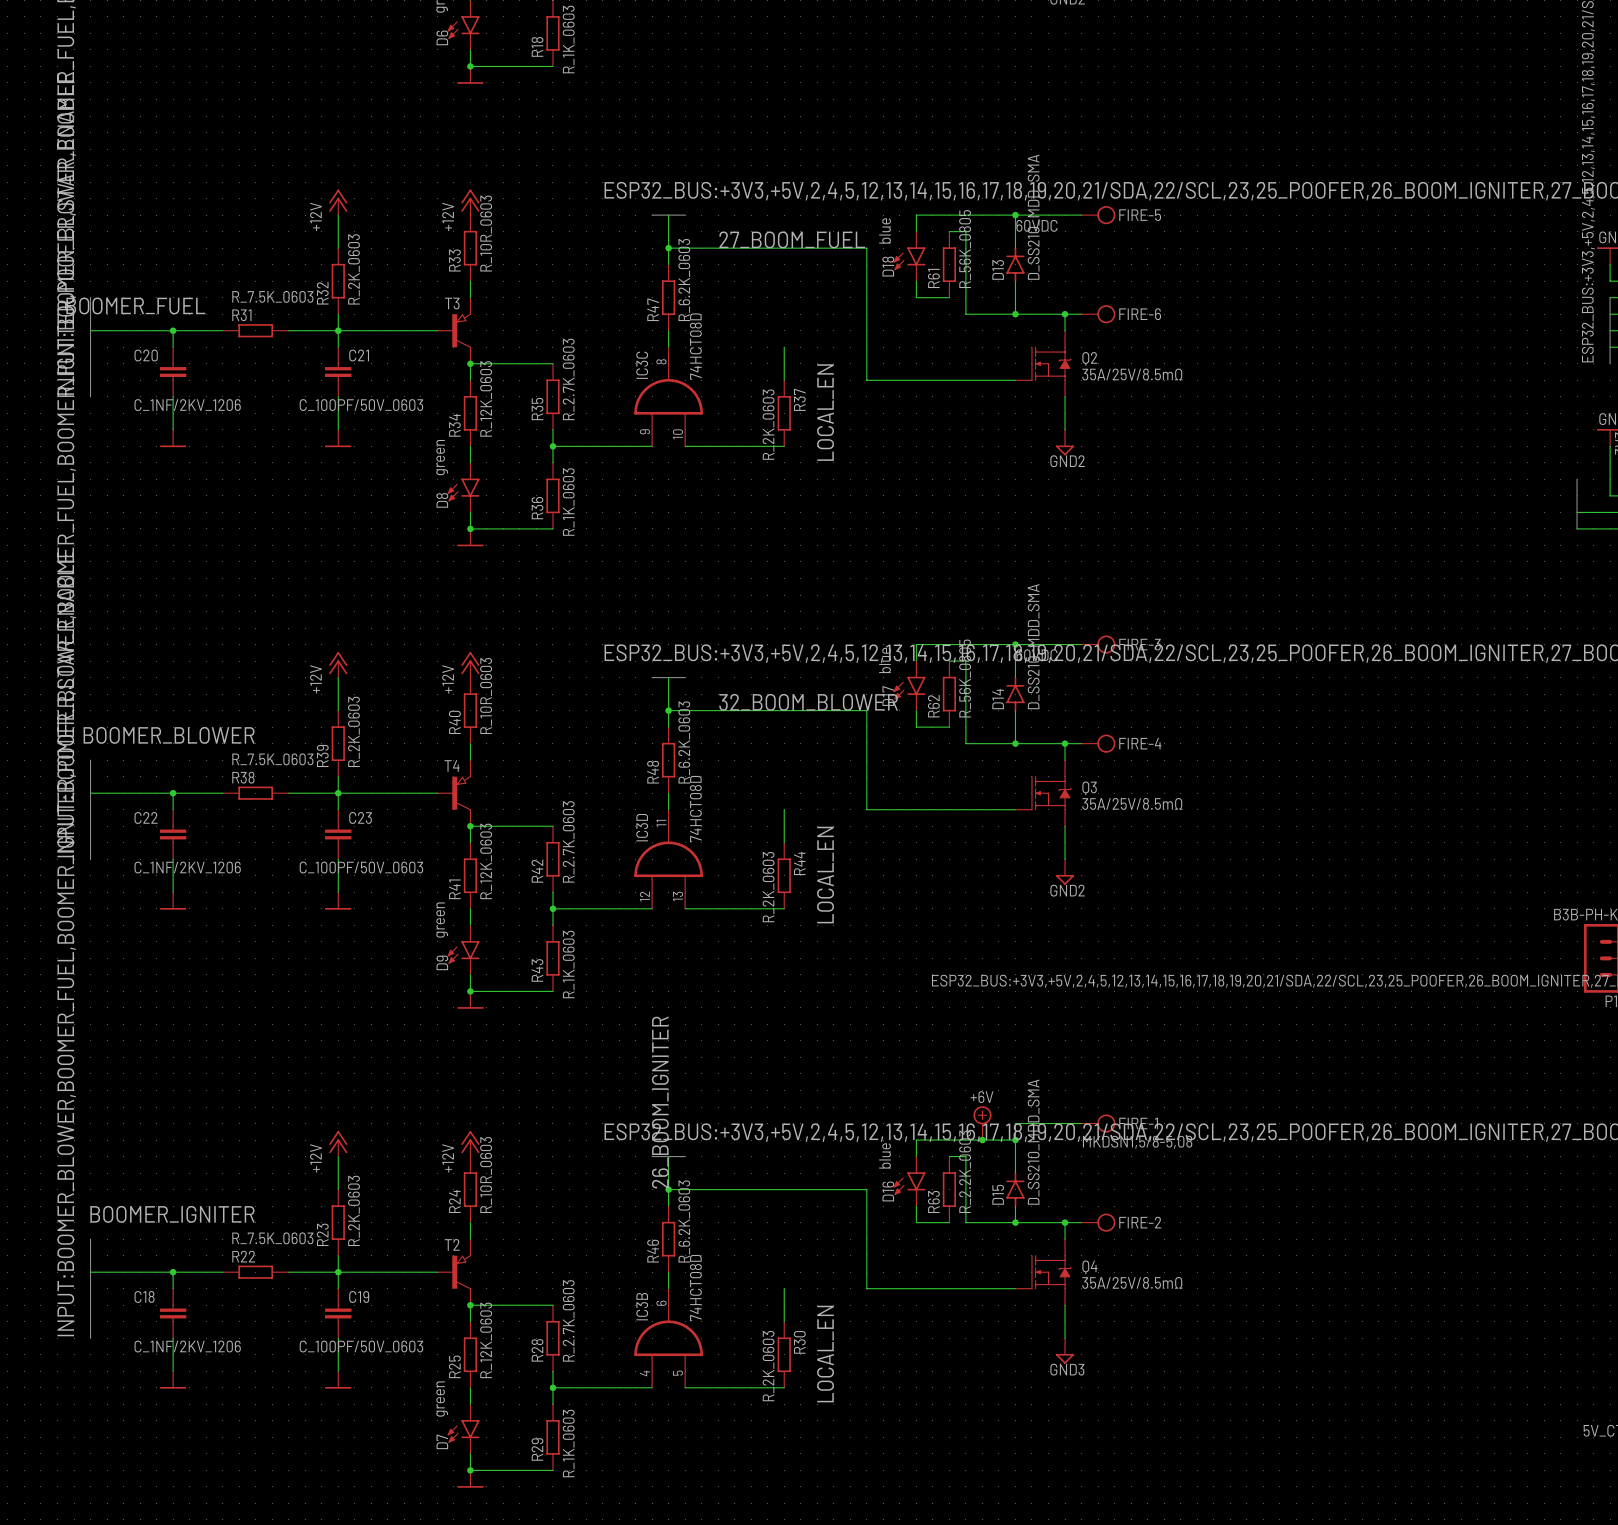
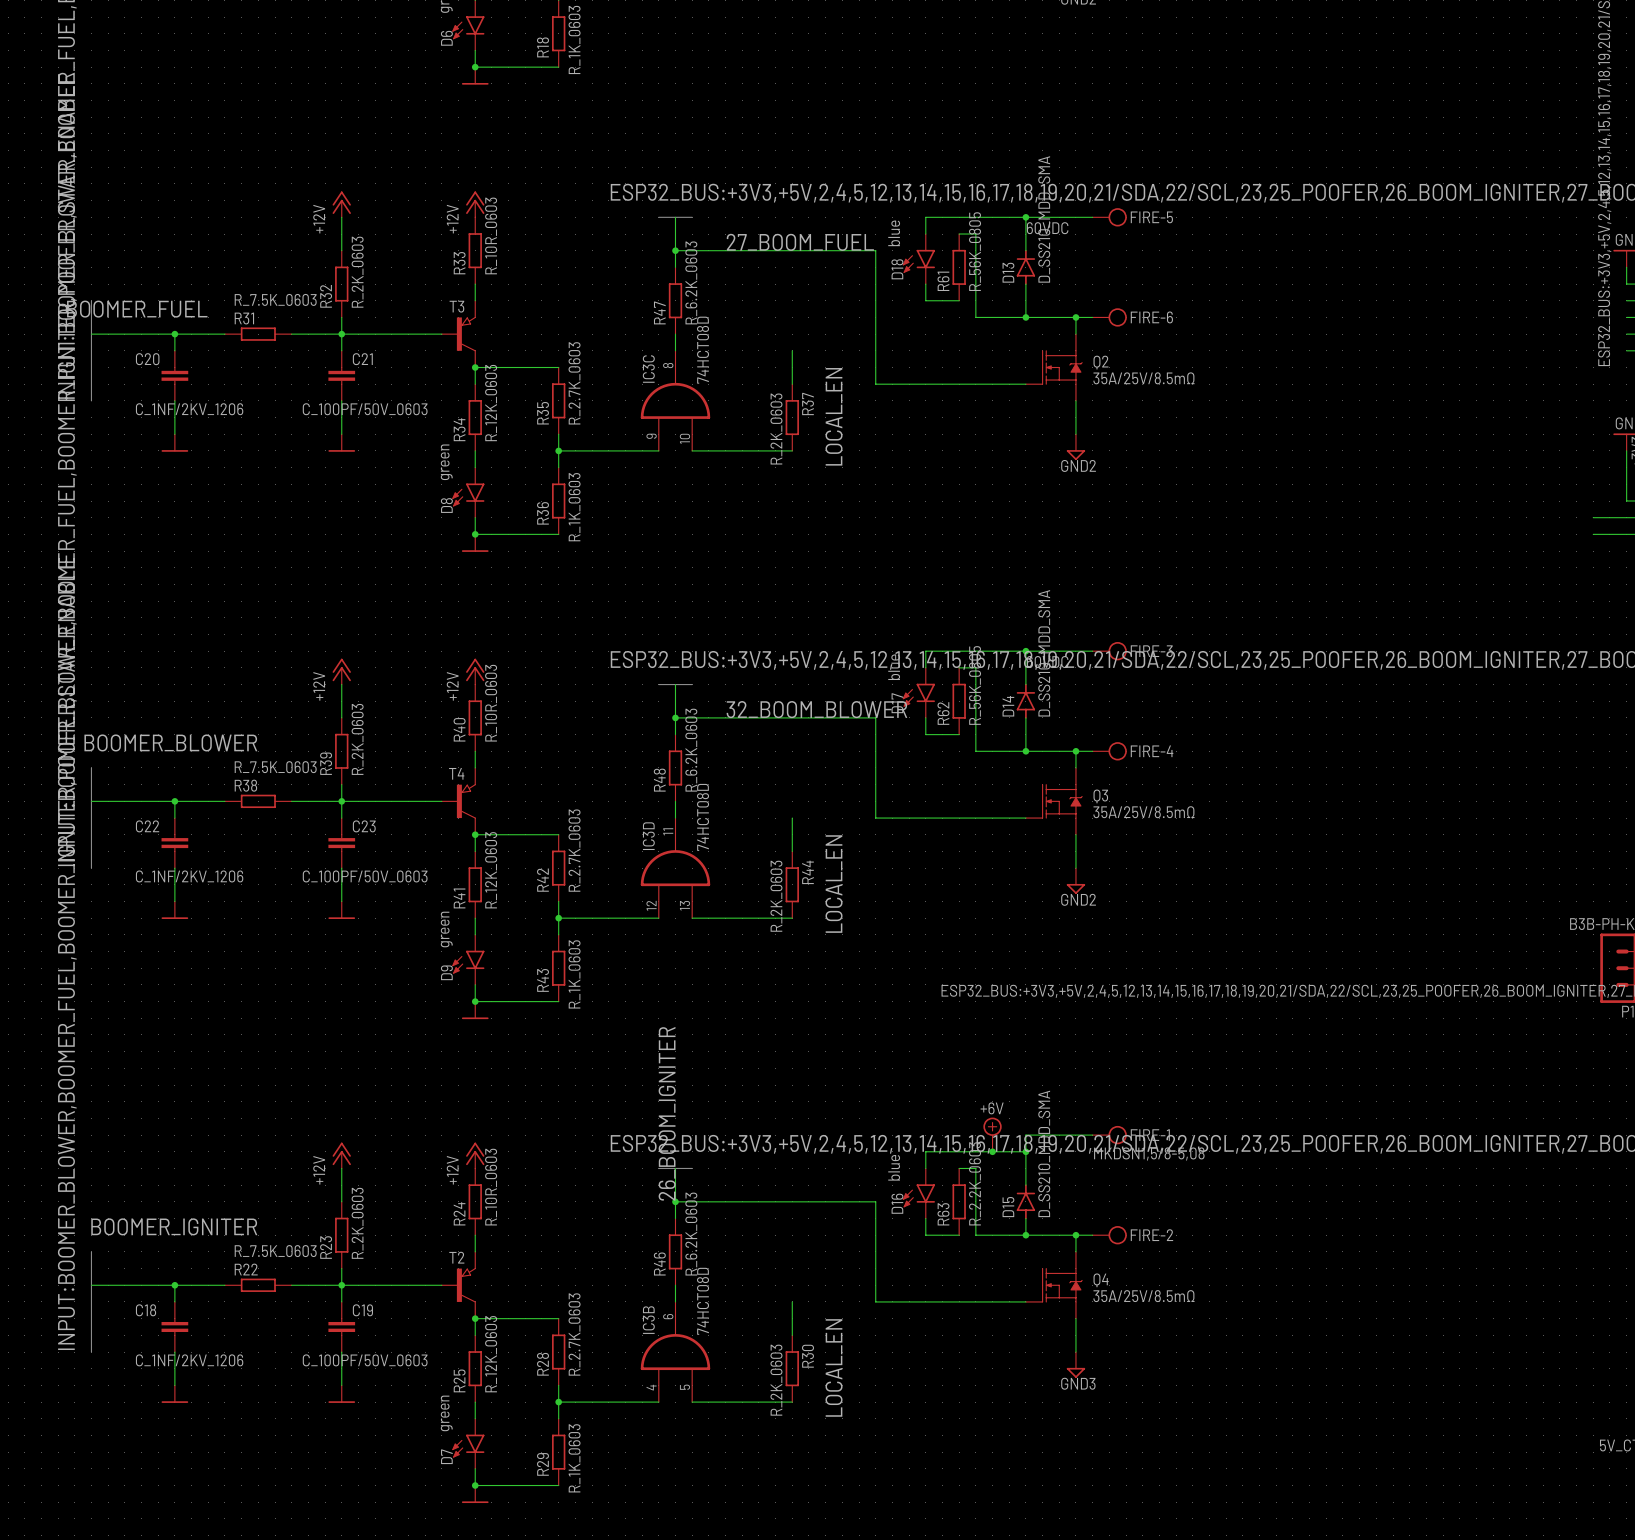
bus: (1610, 297) (1610, 363) -> none
bus: (1577, 479) (1577, 528) -> none

